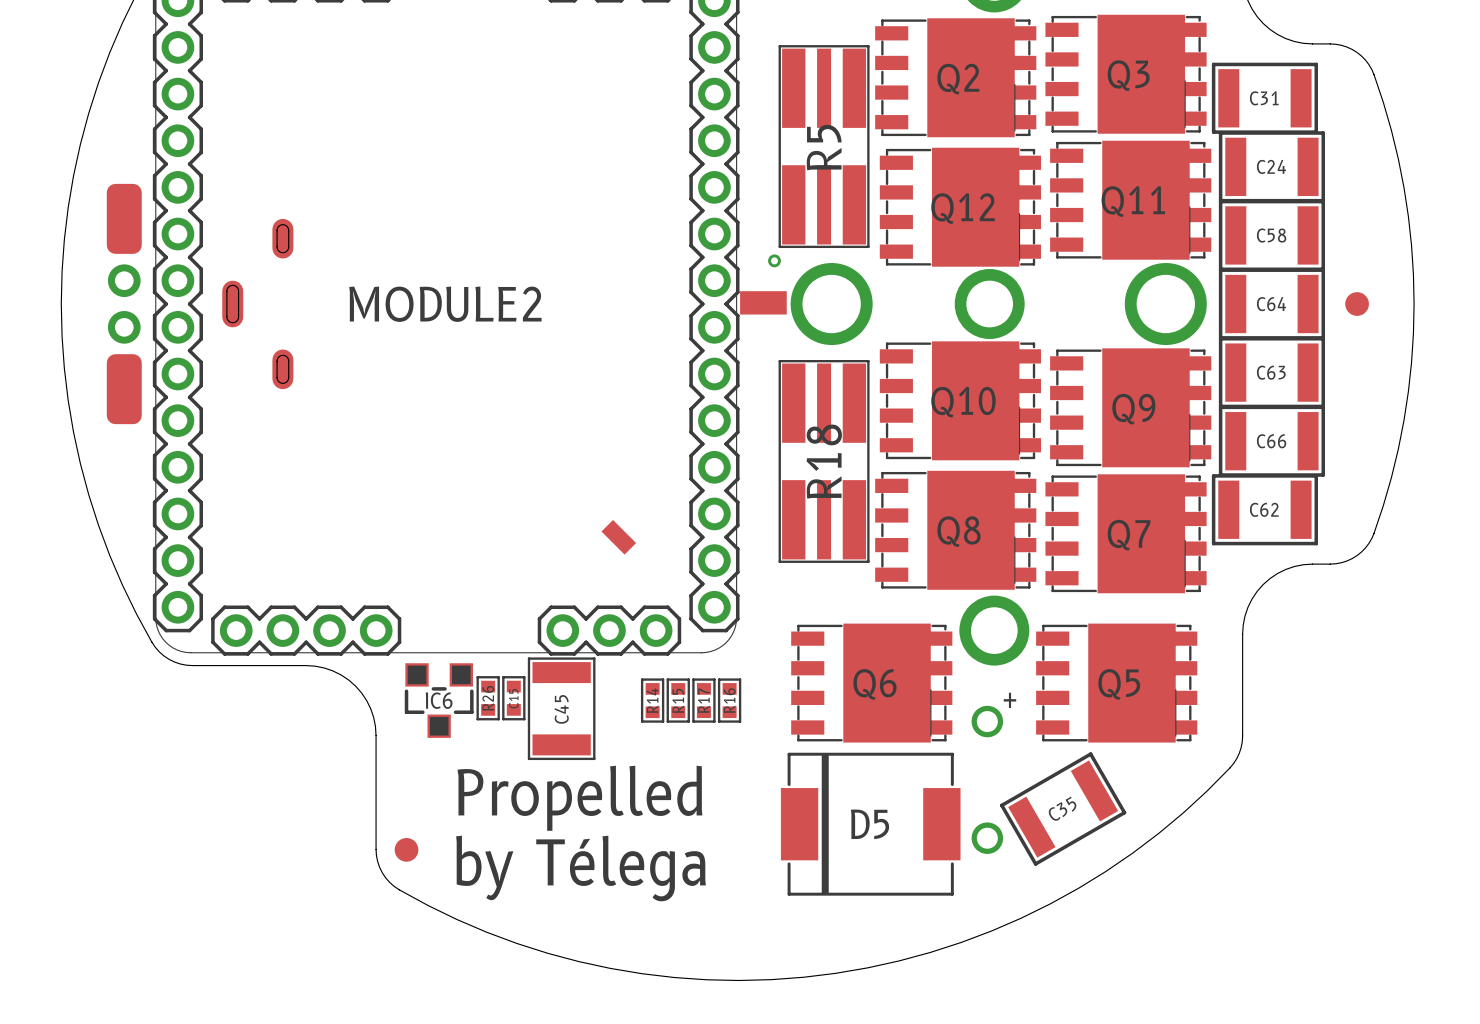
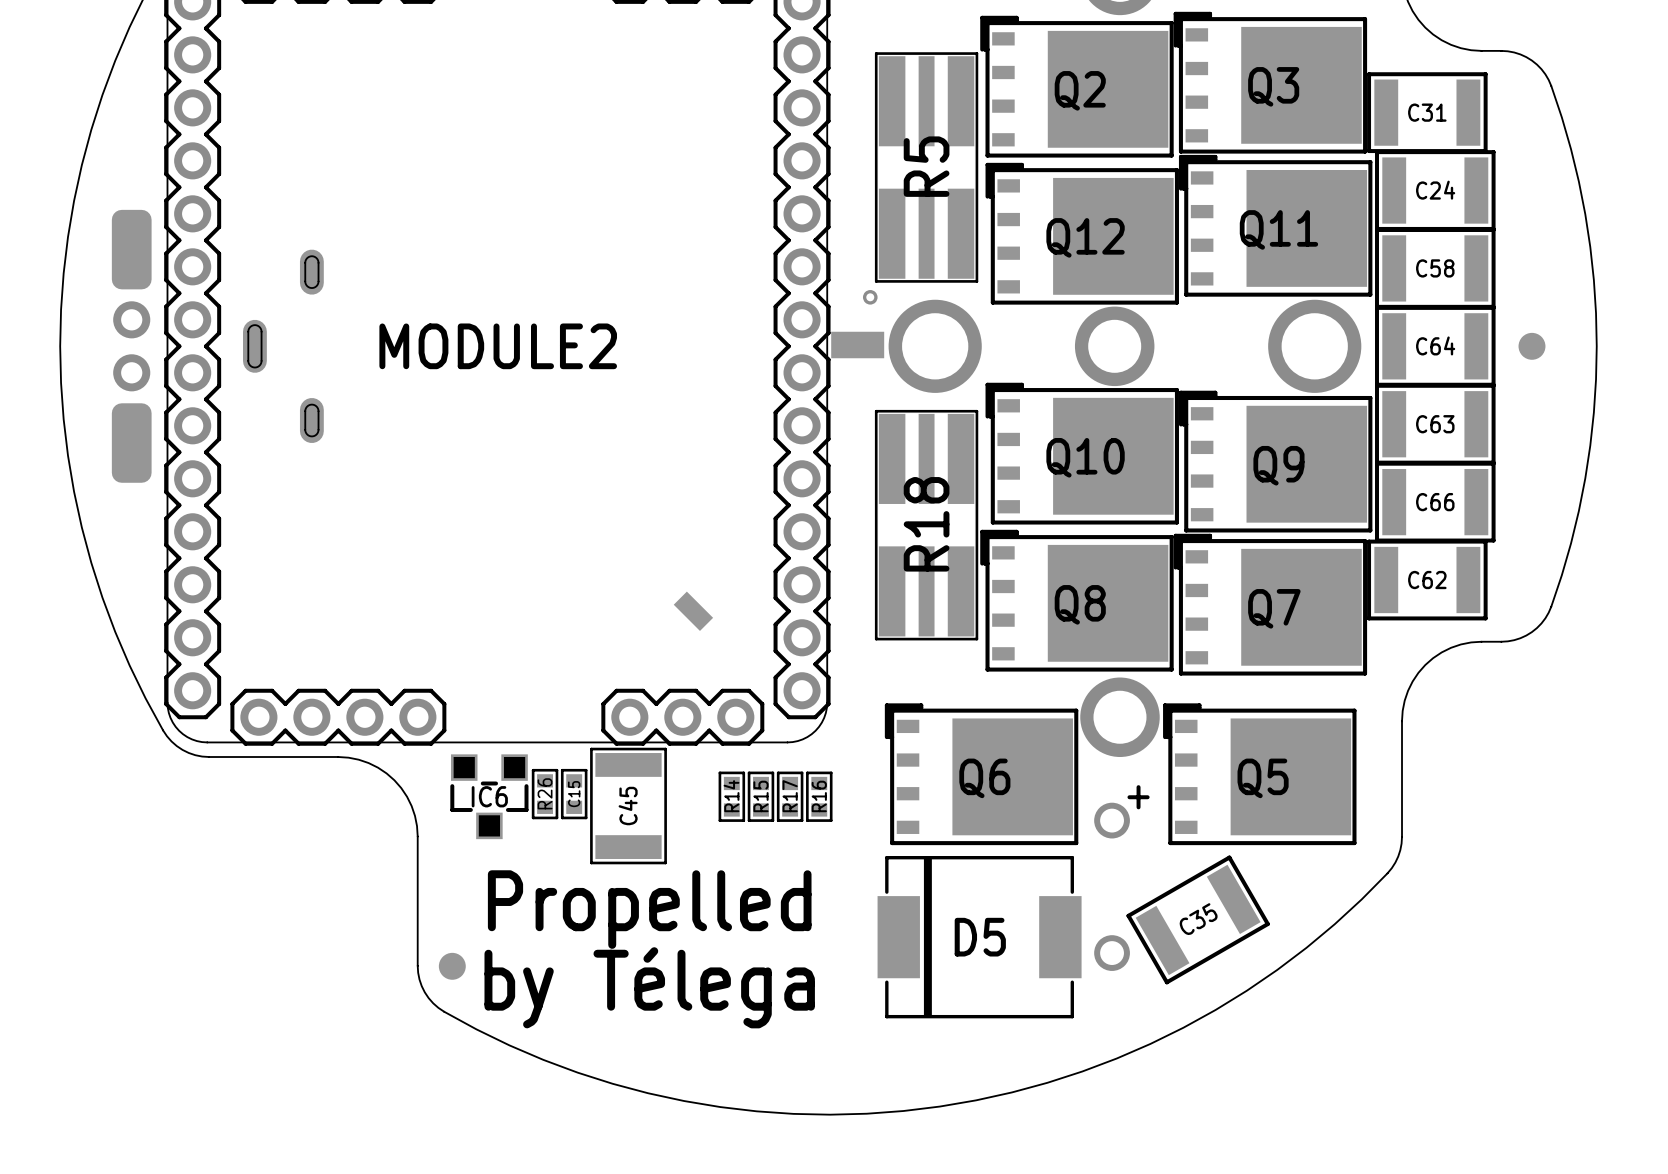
Q3 footprint: [1045, 14, 1207, 134] -> [1173, 11, 1368, 154]
Q2 footprint: [875, 18, 1037, 138] -> [980, 15, 1174, 158]
Q11 footprint: [1050, 140, 1212, 260] -> [1178, 154, 1373, 297]
Q12 footprint: [879, 147, 1042, 267] -> [985, 162, 1179, 305]
Q10 footprint: [879, 341, 1042, 461] -> [985, 382, 1179, 525]
Q9 footprint: [1050, 348, 1212, 468] -> [1178, 390, 1373, 533]
Q8 footprint: [875, 470, 1037, 590] -> [980, 529, 1174, 672]
Q7 footprint: [1045, 474, 1207, 594] -> [1173, 533, 1368, 676]
Q6 footprint: [791, 623, 953, 743] -> [884, 703, 1079, 846]
Q5 footprint: [1036, 623, 1198, 743] -> [1163, 703, 1357, 846]

